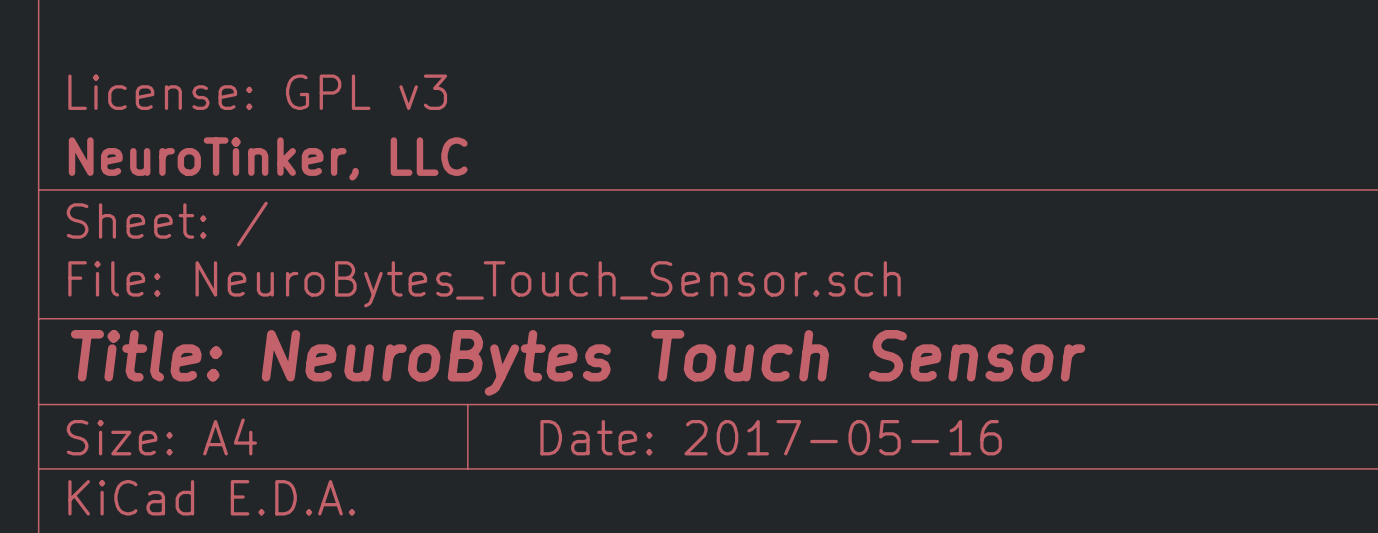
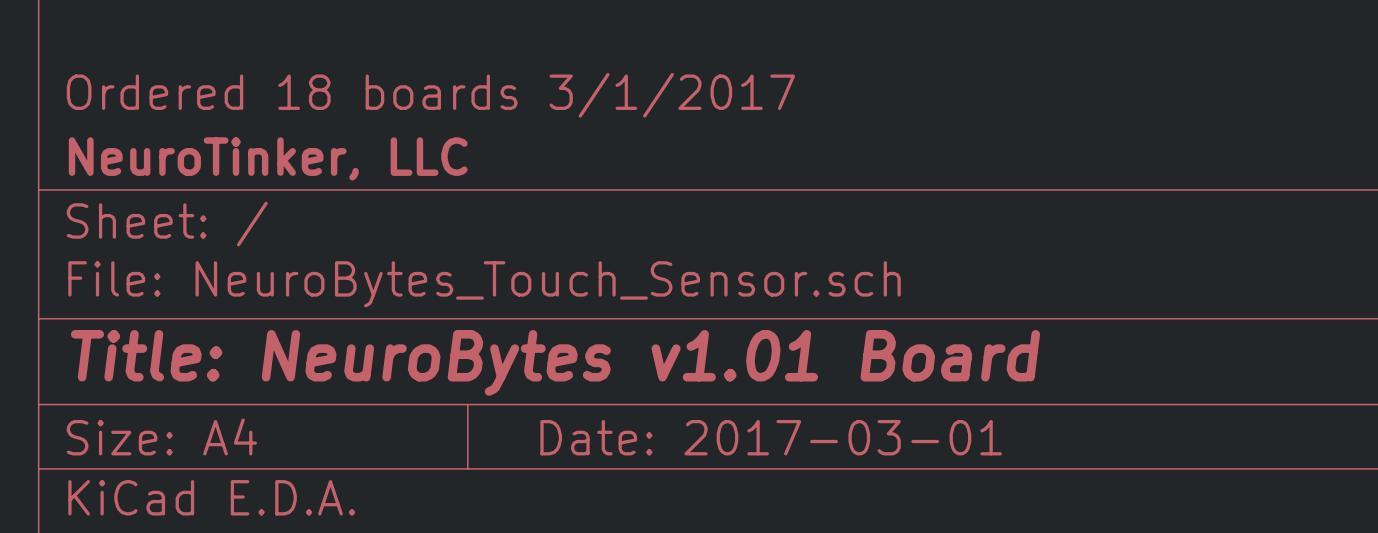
title block: License: GPL v3 (257, 92) -> Ordered 18 boards 3/1/2017 (430, 95)
title block: Title: NeuroBytes Touch Sensor (578, 362) -> Title: NeuroBytes v1.01 Board (555, 362)
title block: Date: 2017-05-16 (771, 437) -> Date: 2017-03-01 (771, 437)

